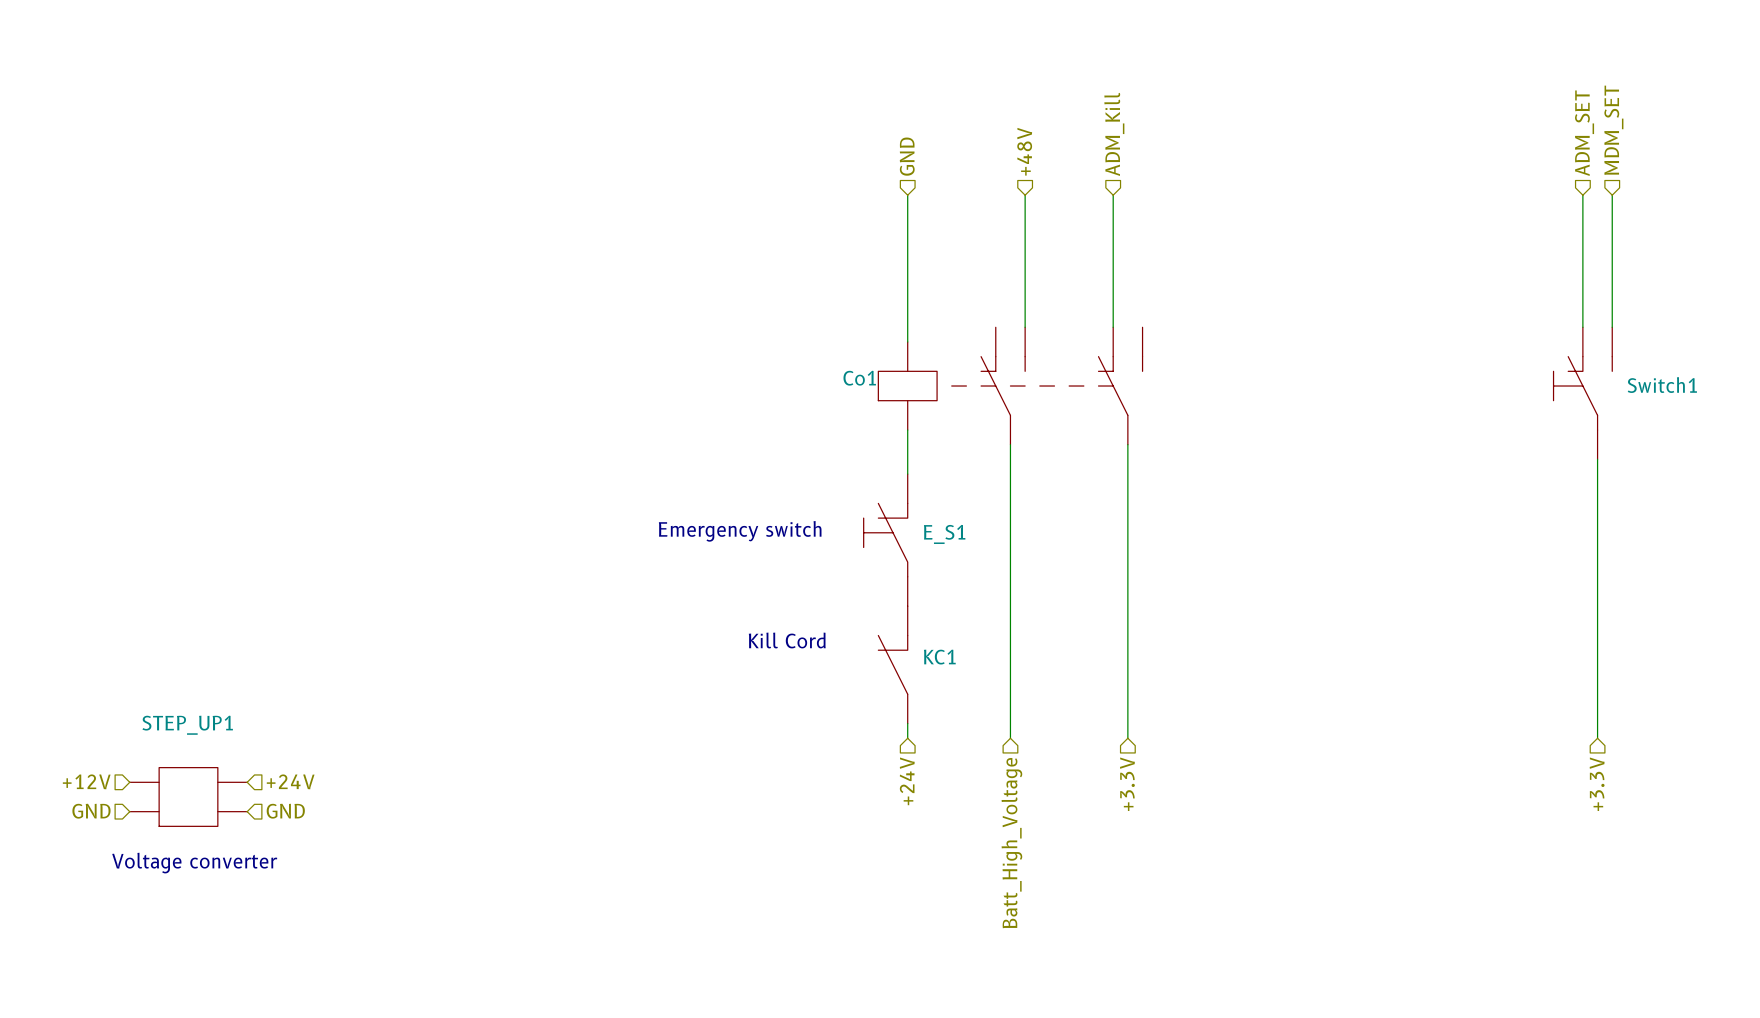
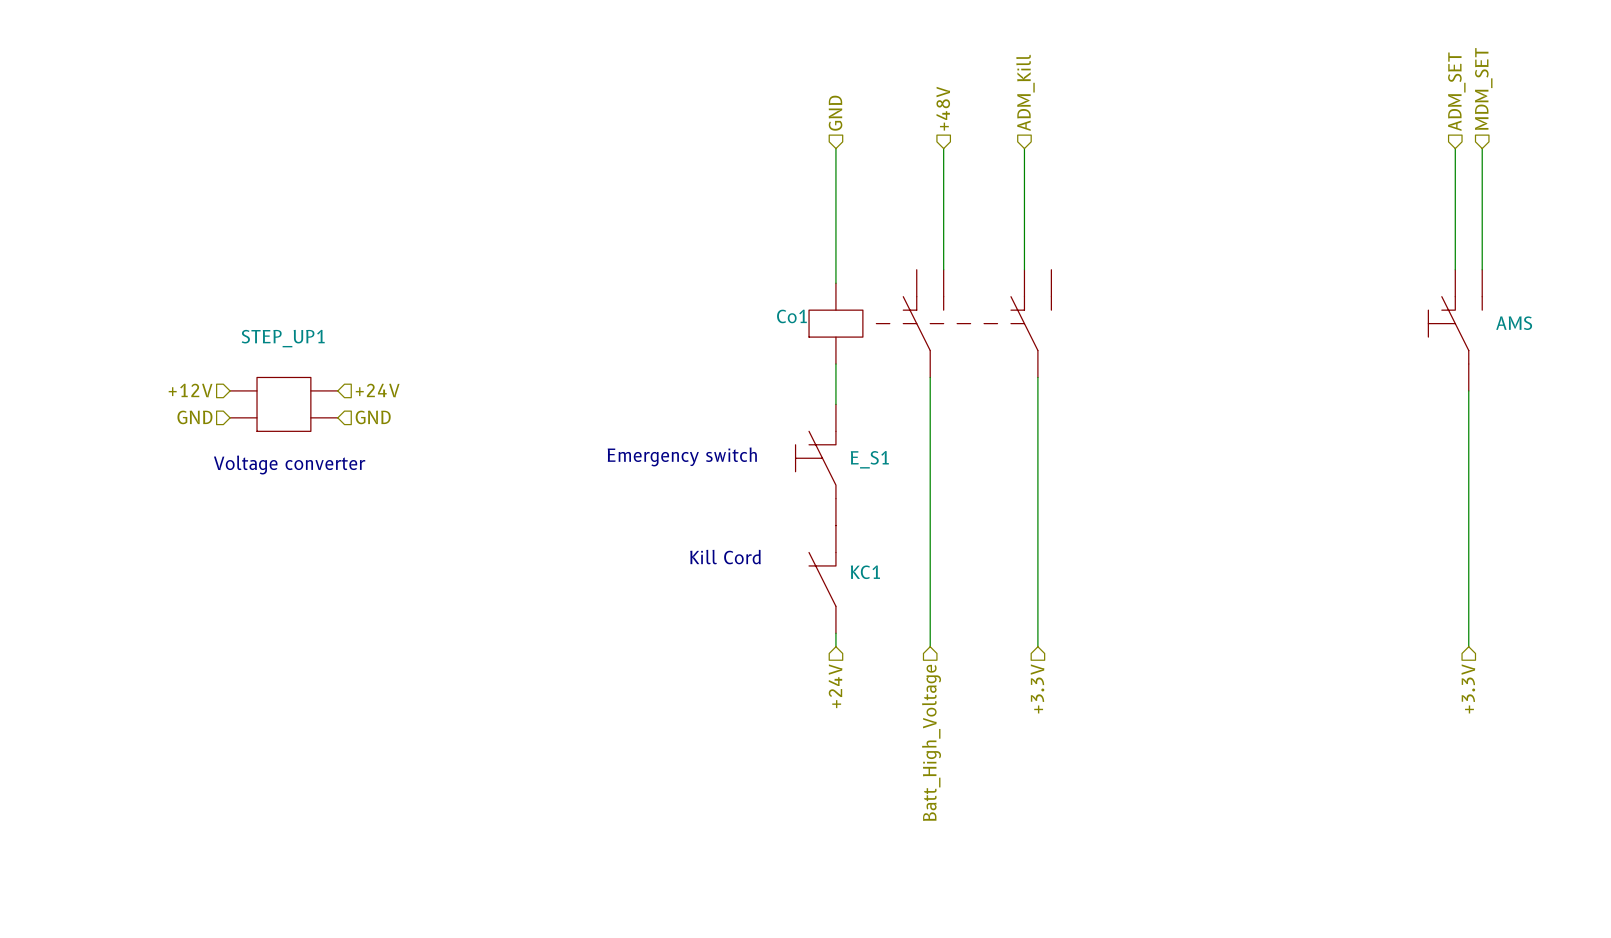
Switch1 name: Switch1 (1662, 385) -> AMS (1514, 323)
hierarchical label: none -> +12V (190, 390)
hierarchical label: none -> +24V (377, 390)
hierarchical label: none -> GND (194, 417)
hierarchical label: none -> GND (373, 417)
text: none -> Voltage converter (289, 465)
hierarchical label: +12V (86, 781) -> none
hierarchical label: +24V (290, 781) -> none
STEP_UP1 position: (188, 796) -> (283, 404)
hierarchical label: GND (91, 811) -> none
hierarchical label: GND (285, 811) -> none
text: Voltage converter (194, 863) -> none

